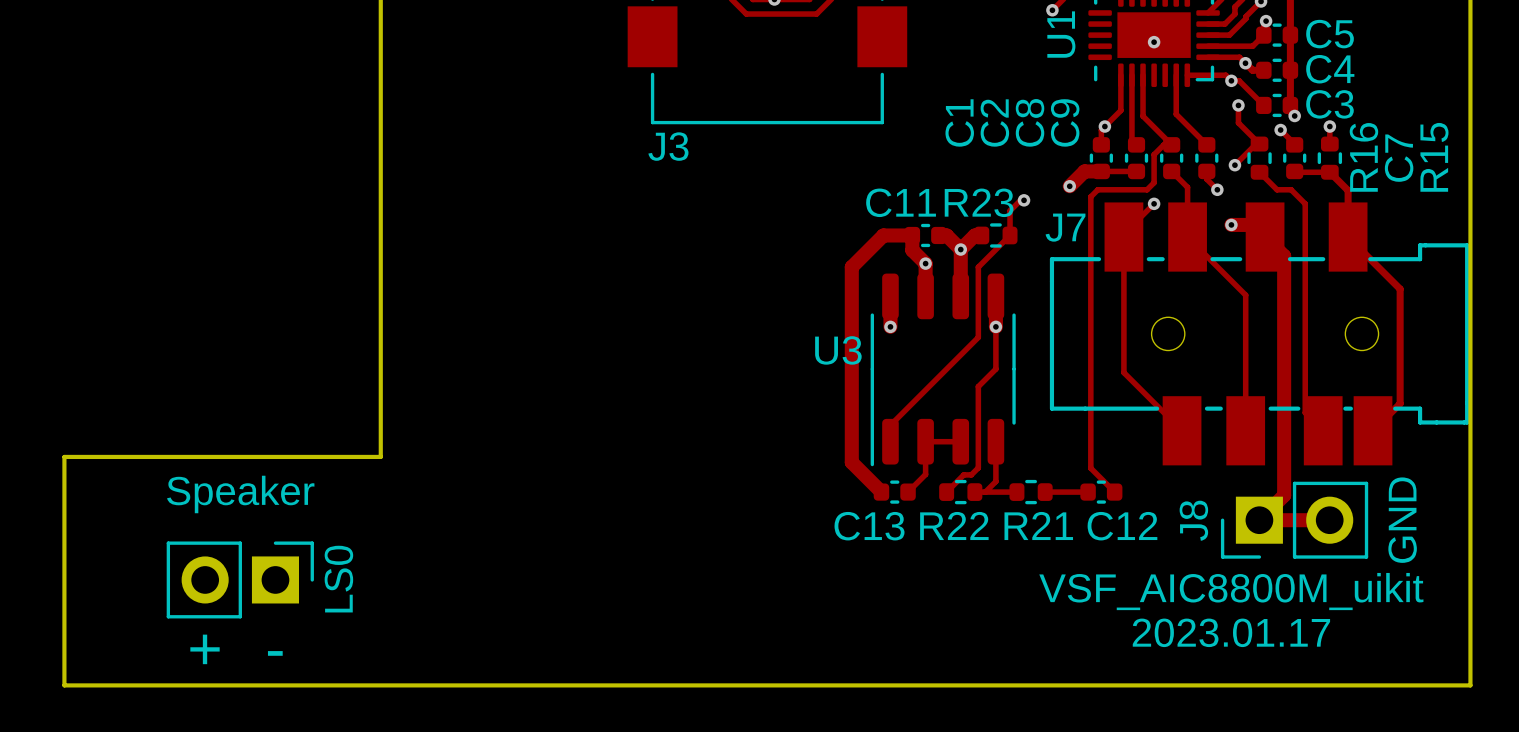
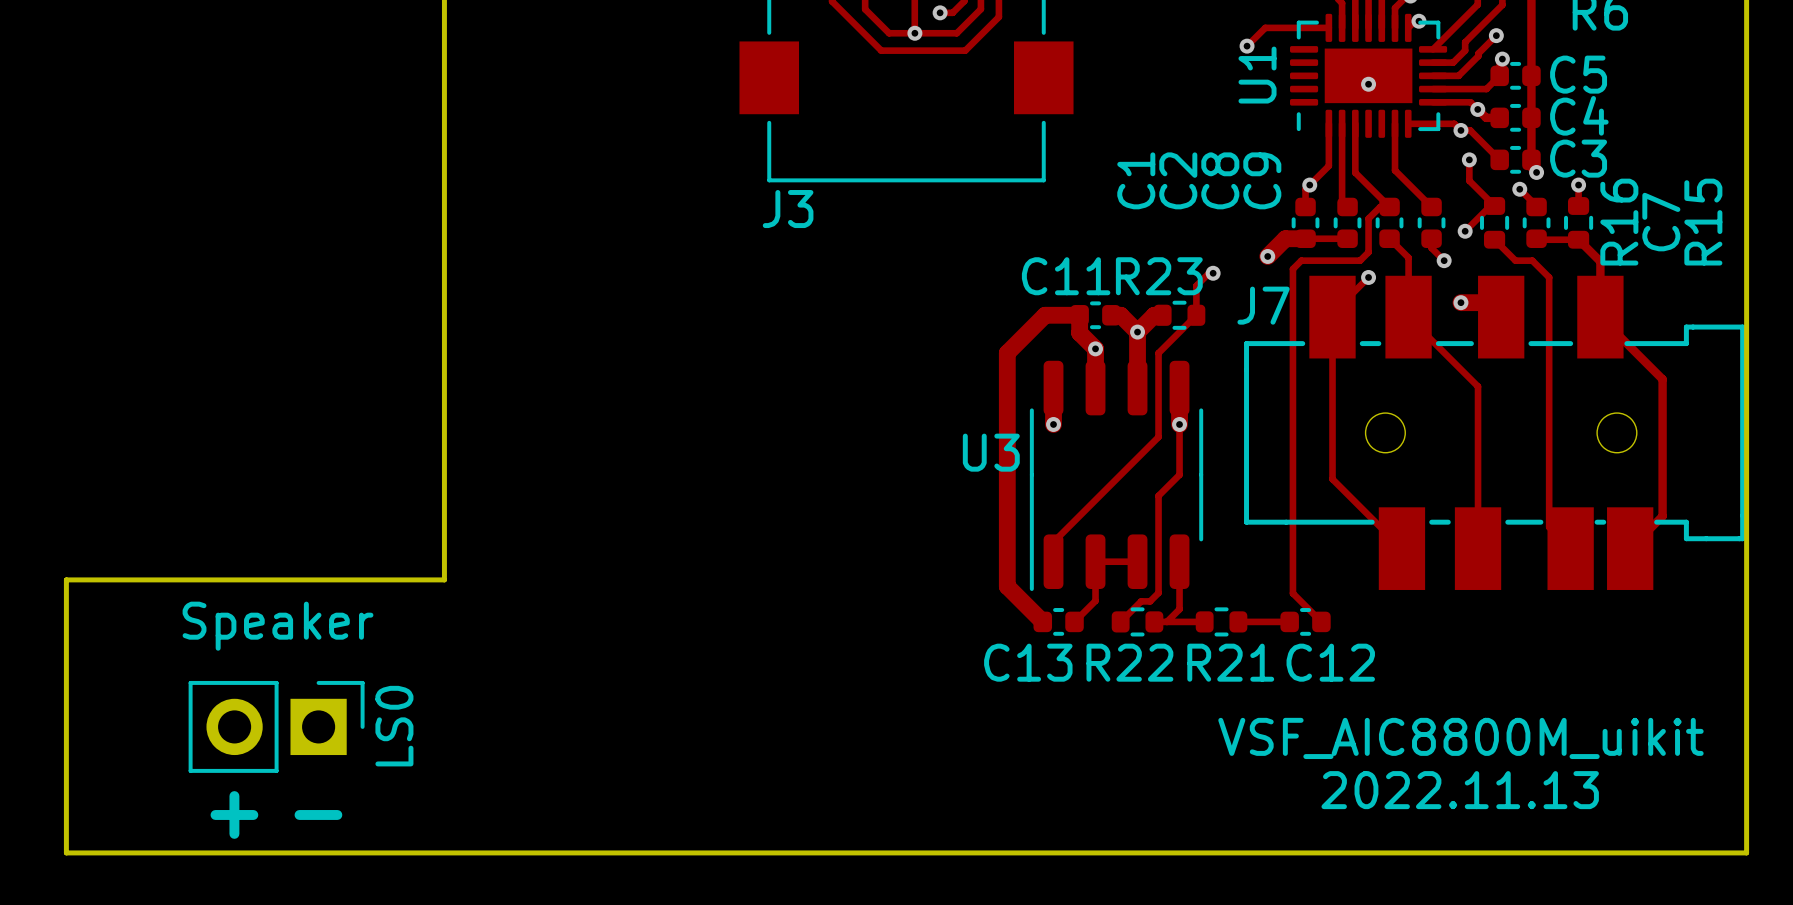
track: (1265, 237) (1284, 256) (1284, 495) (1259, 520) (1329, 520) -> none
J8: (1294, 520) -> none
text: GND (1402, 520) -> none
text: 2023.01.17 (1231, 632) -> 2022.11.13 (1460, 790)

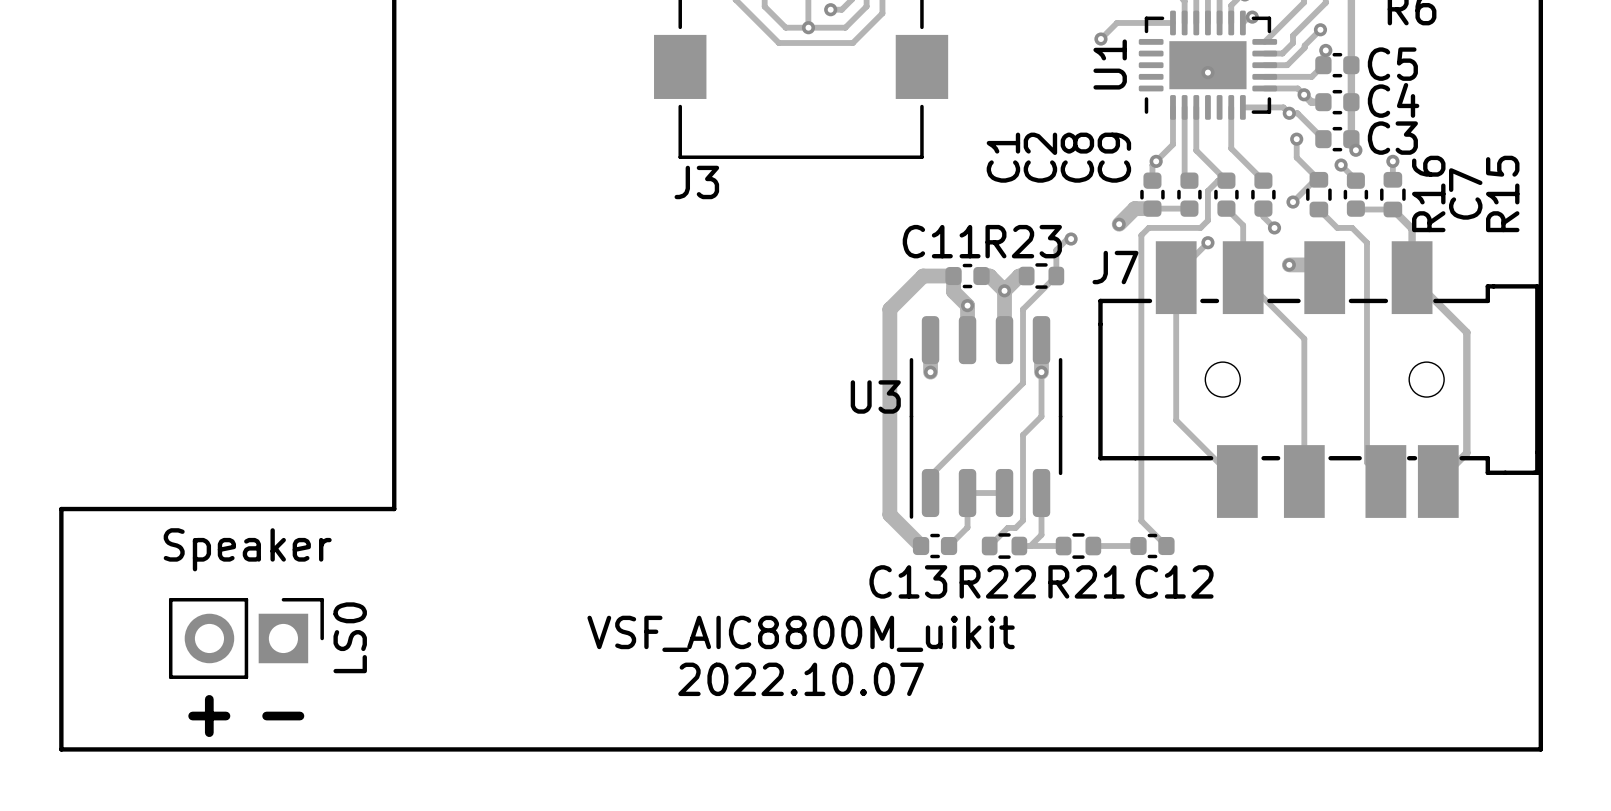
text position: VSF_AIC8800M_uikit (1460, 738) -> VSF_AIC8800M_uikit (801, 633)
text: none -> 2022.10.07 (801, 679)
text: 2022.11.13 (1460, 790) -> none

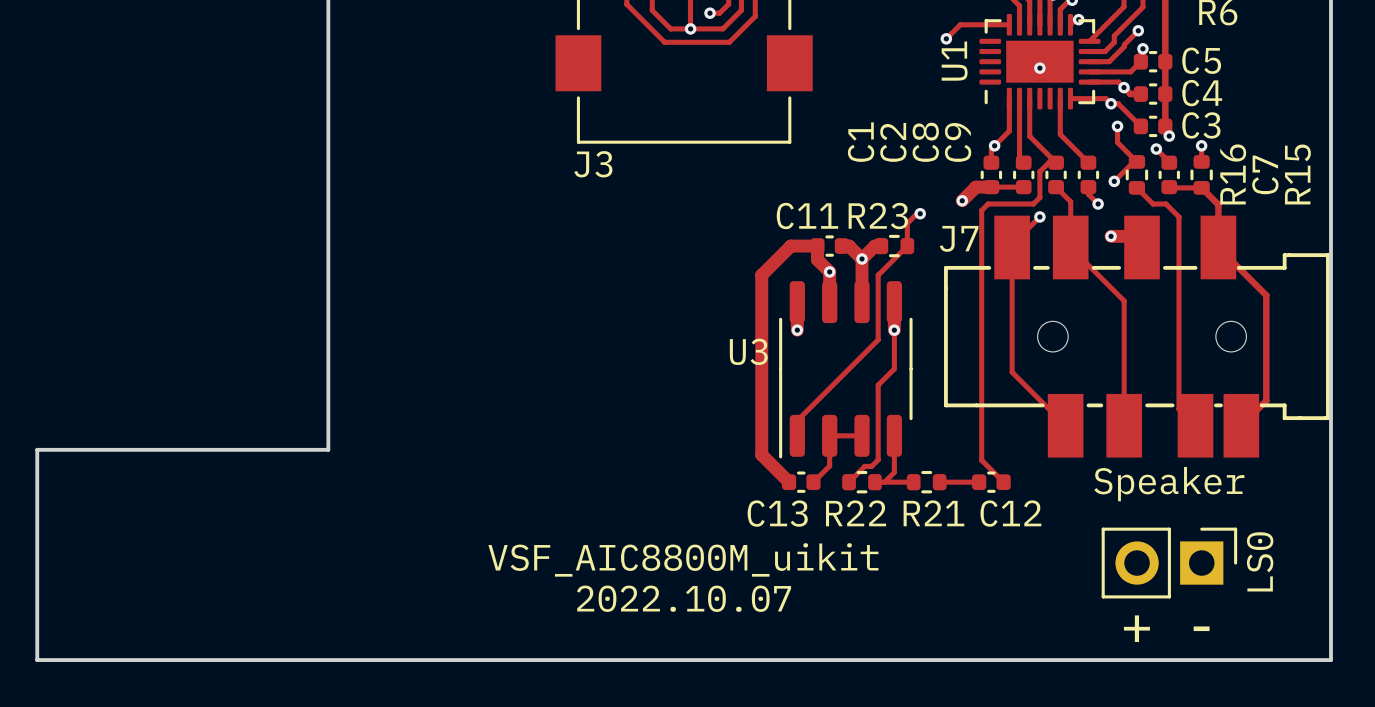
text: Speaker (247, 549) -> none
text: none -> Speaker (1169, 484)
LS0 position: (246, 638) -> (1169, 563)
text: + (209, 716) -> none
text: - (283, 716) -> none
text: none -> + (1136, 628)
text: none -> - (1201, 628)

